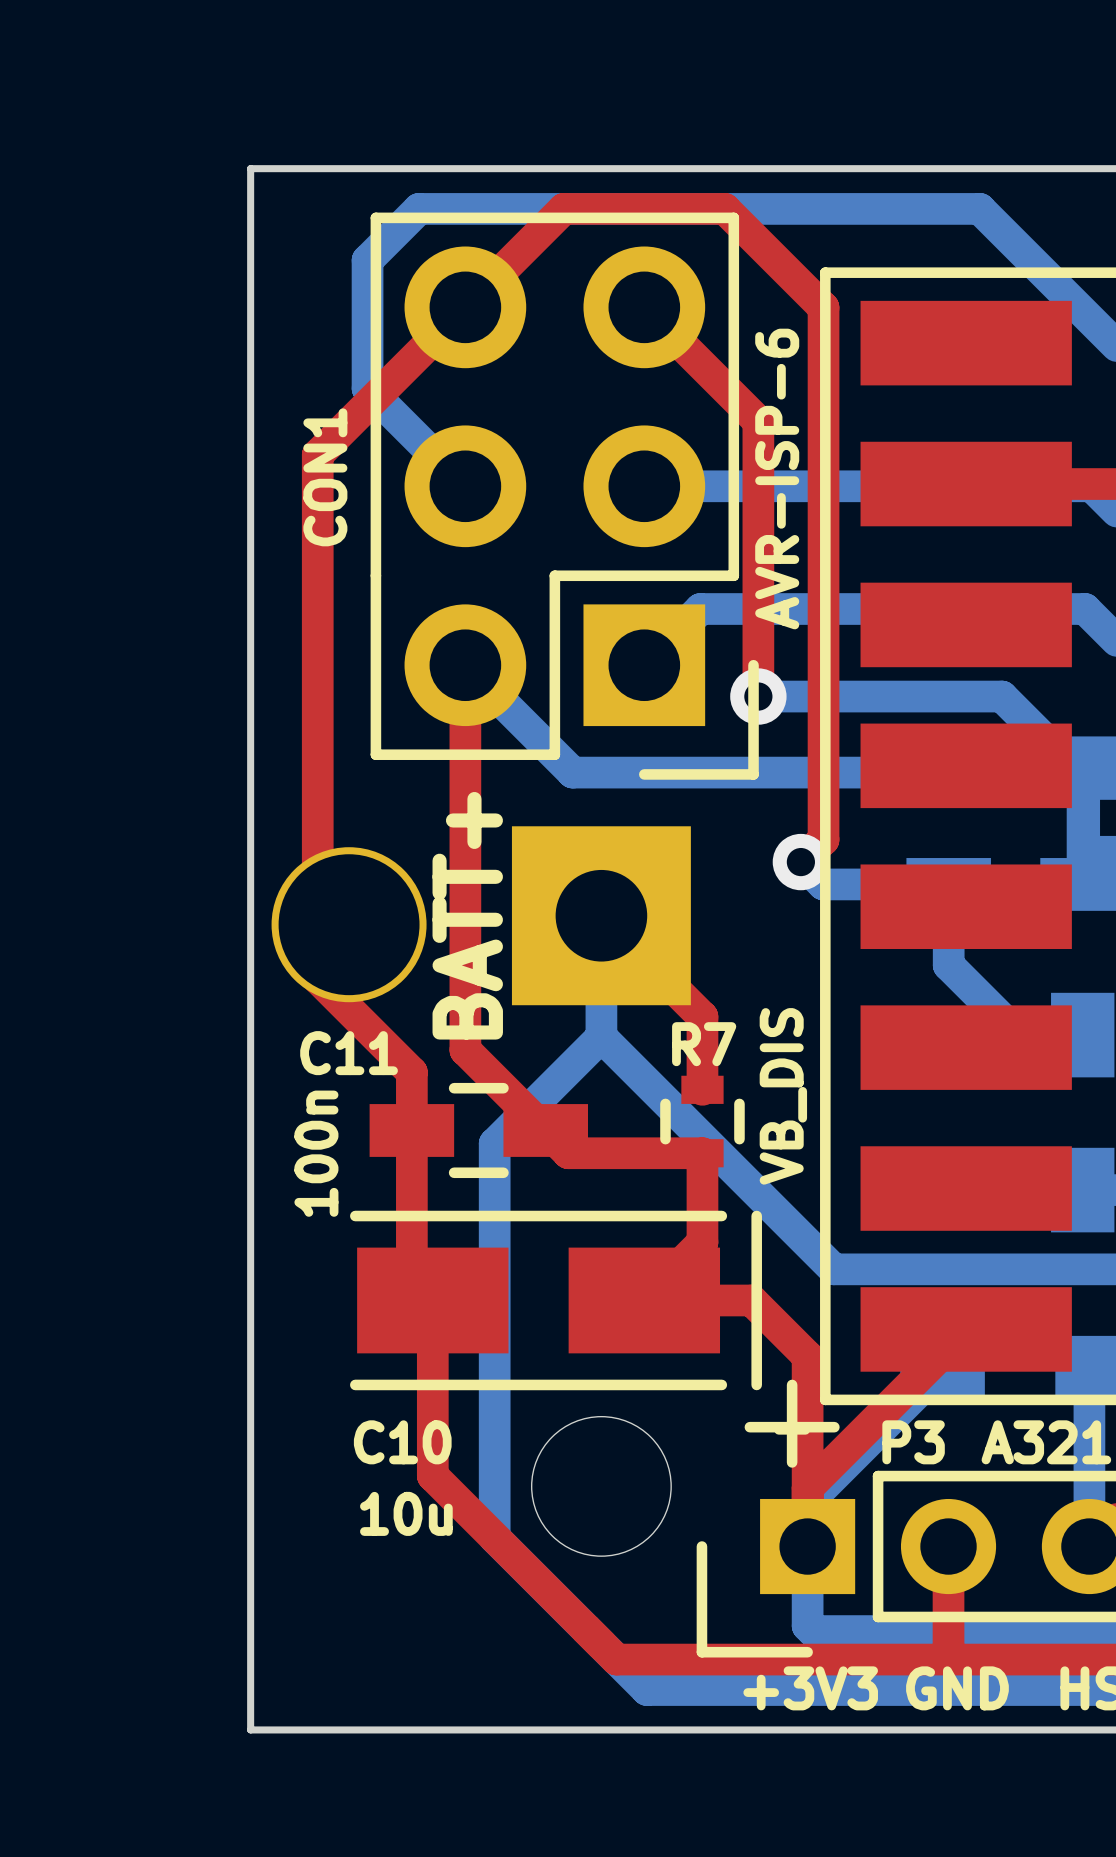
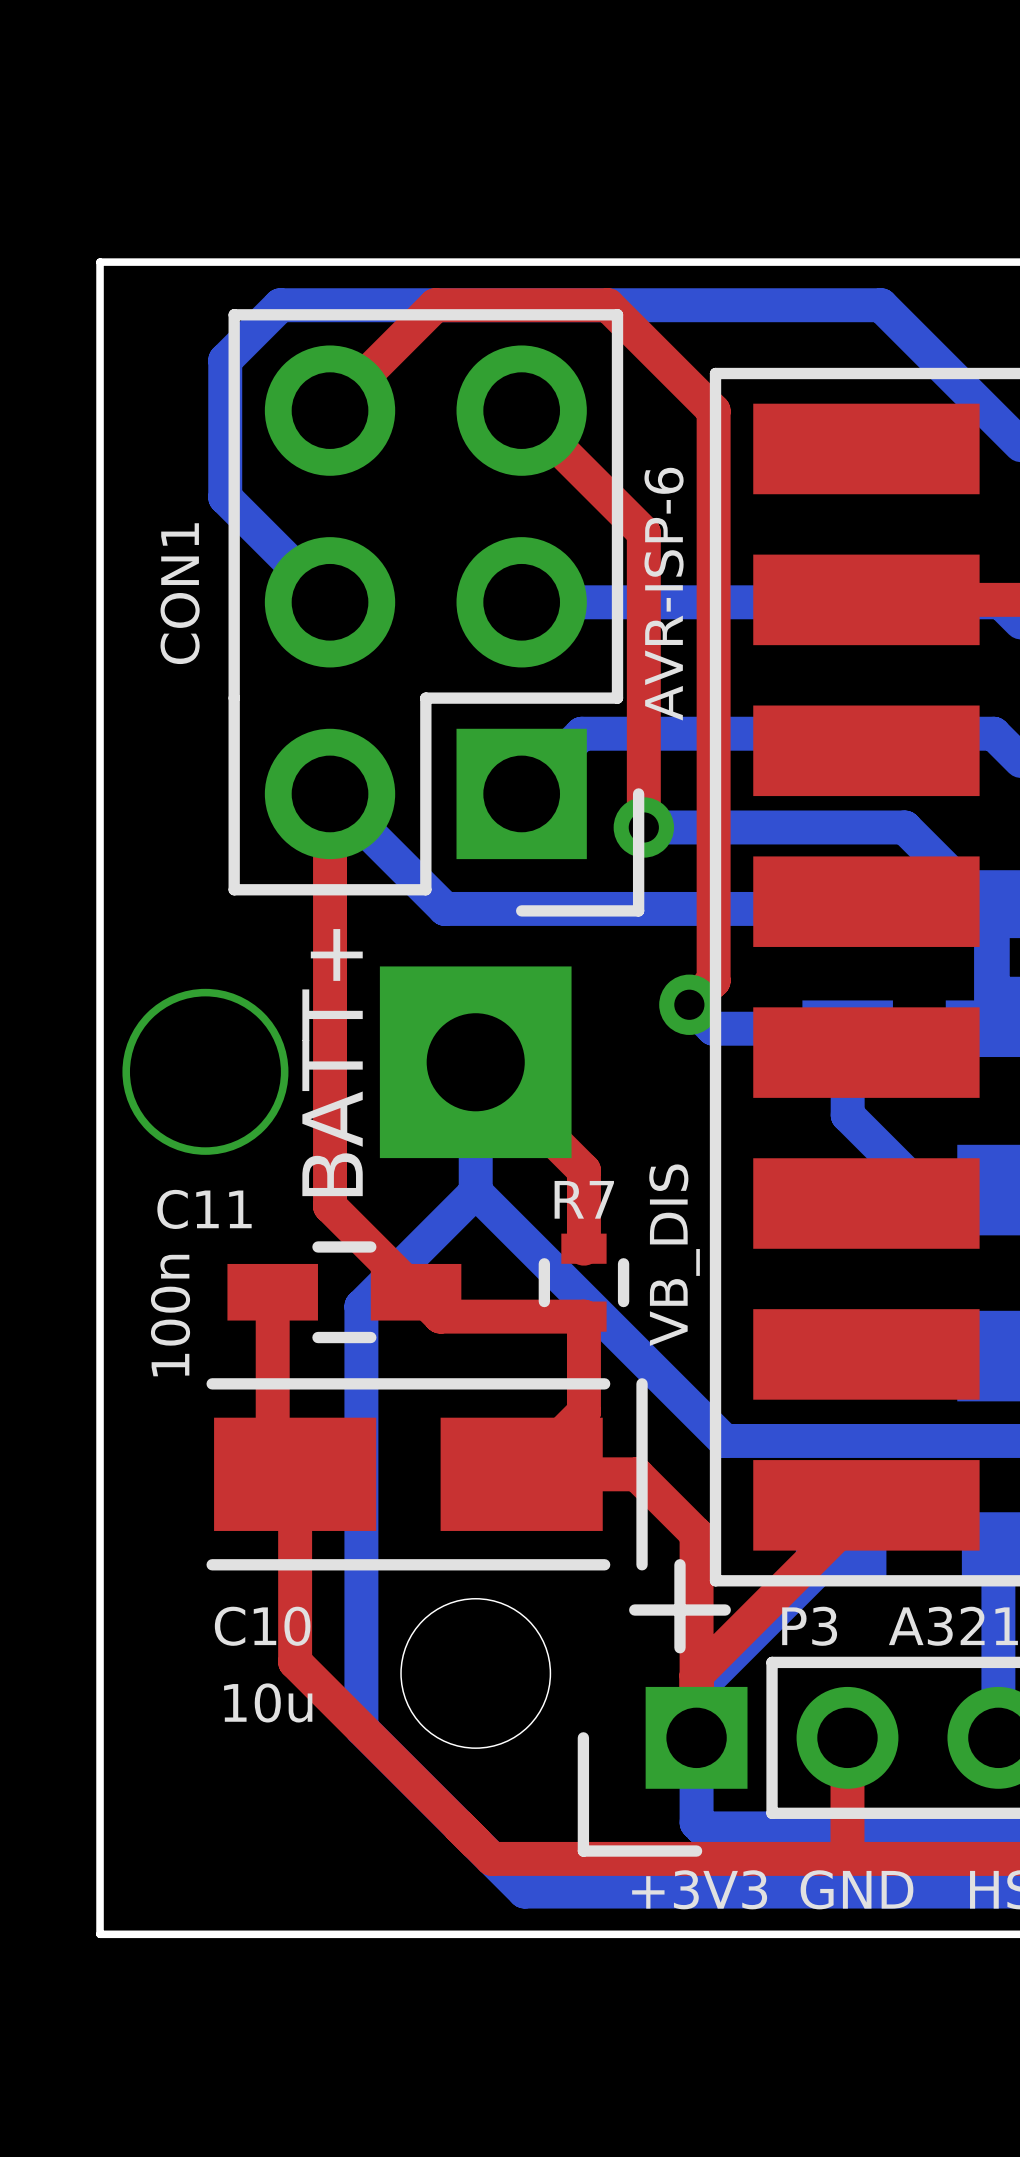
top track: (465, 307) (317, 454) (317, 978) (411, 1072) (411, 1130) -> none

